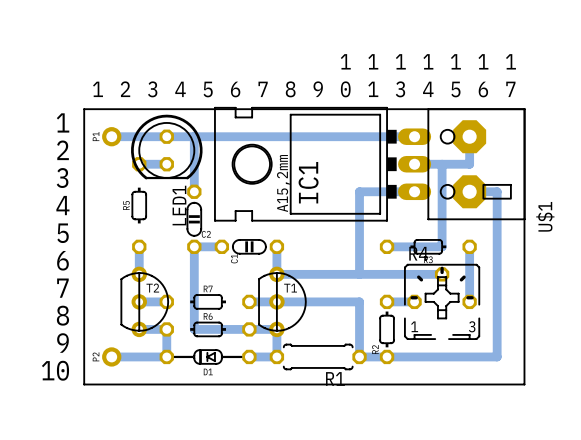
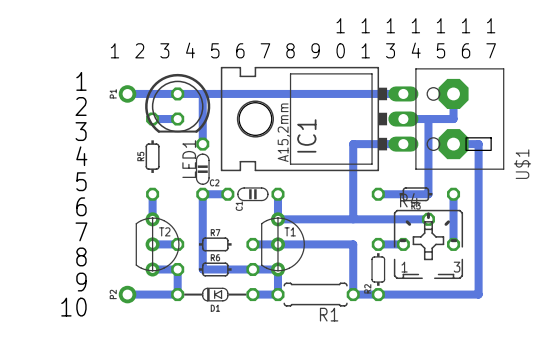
board edge: (84, 109) (524, 109) (524, 384) (84, 384) (84, 109) -> none

